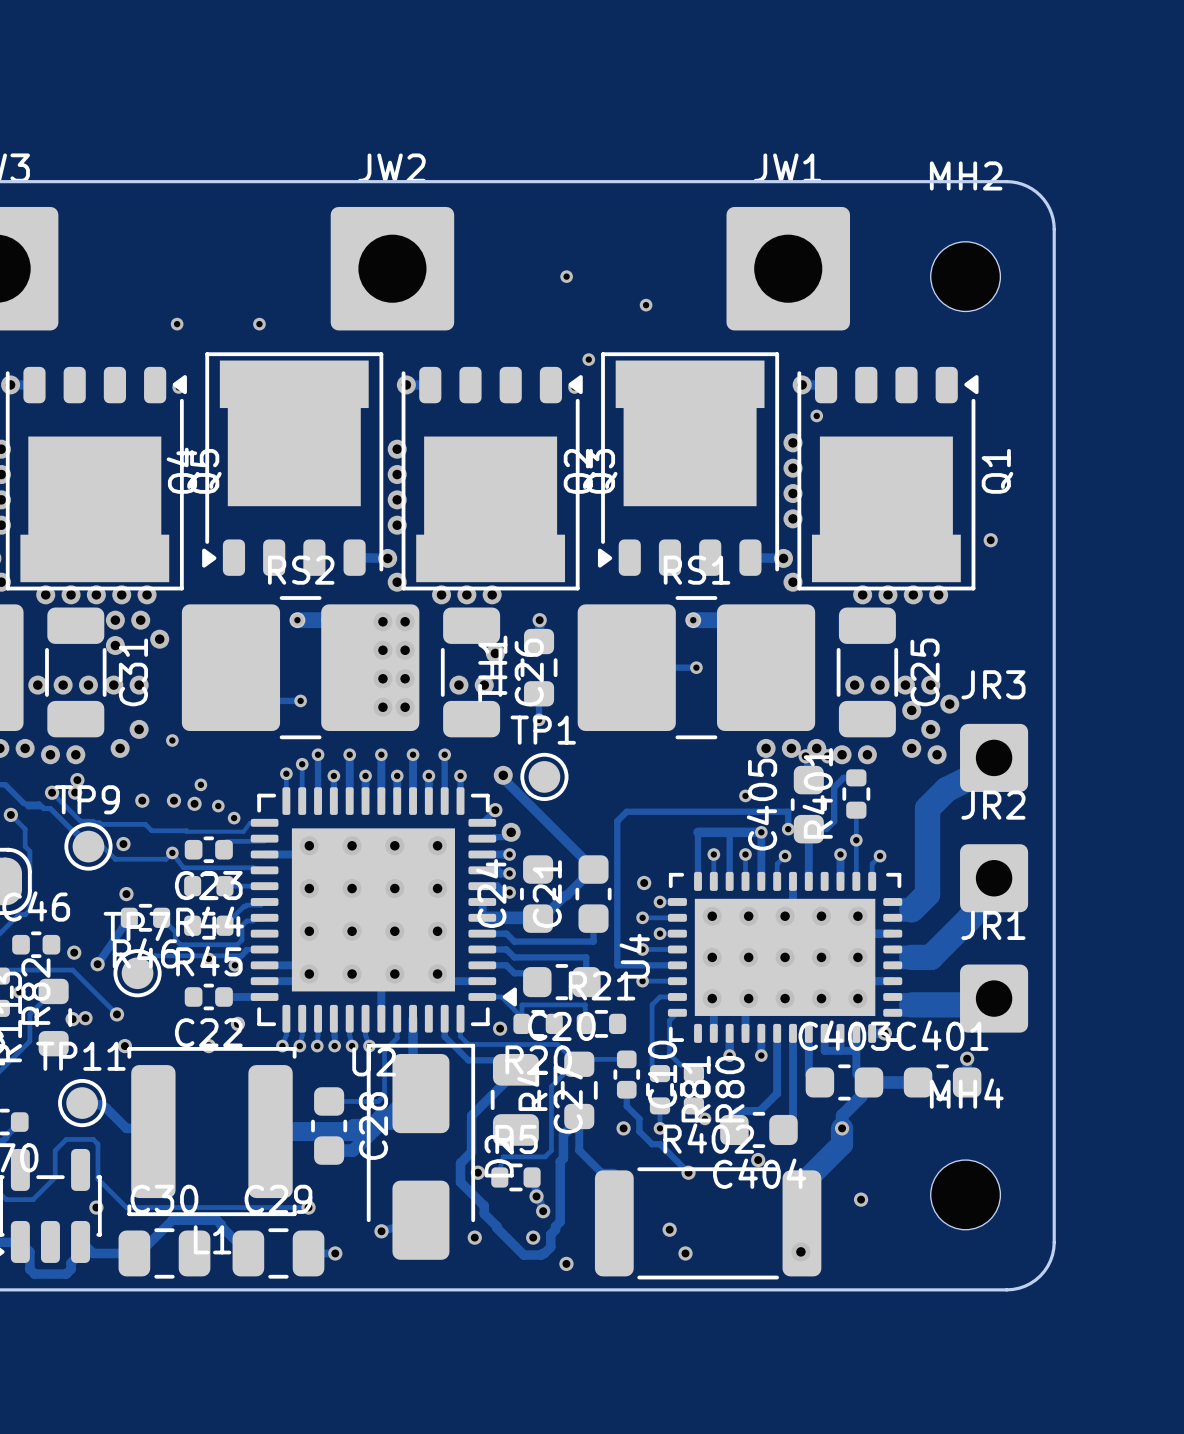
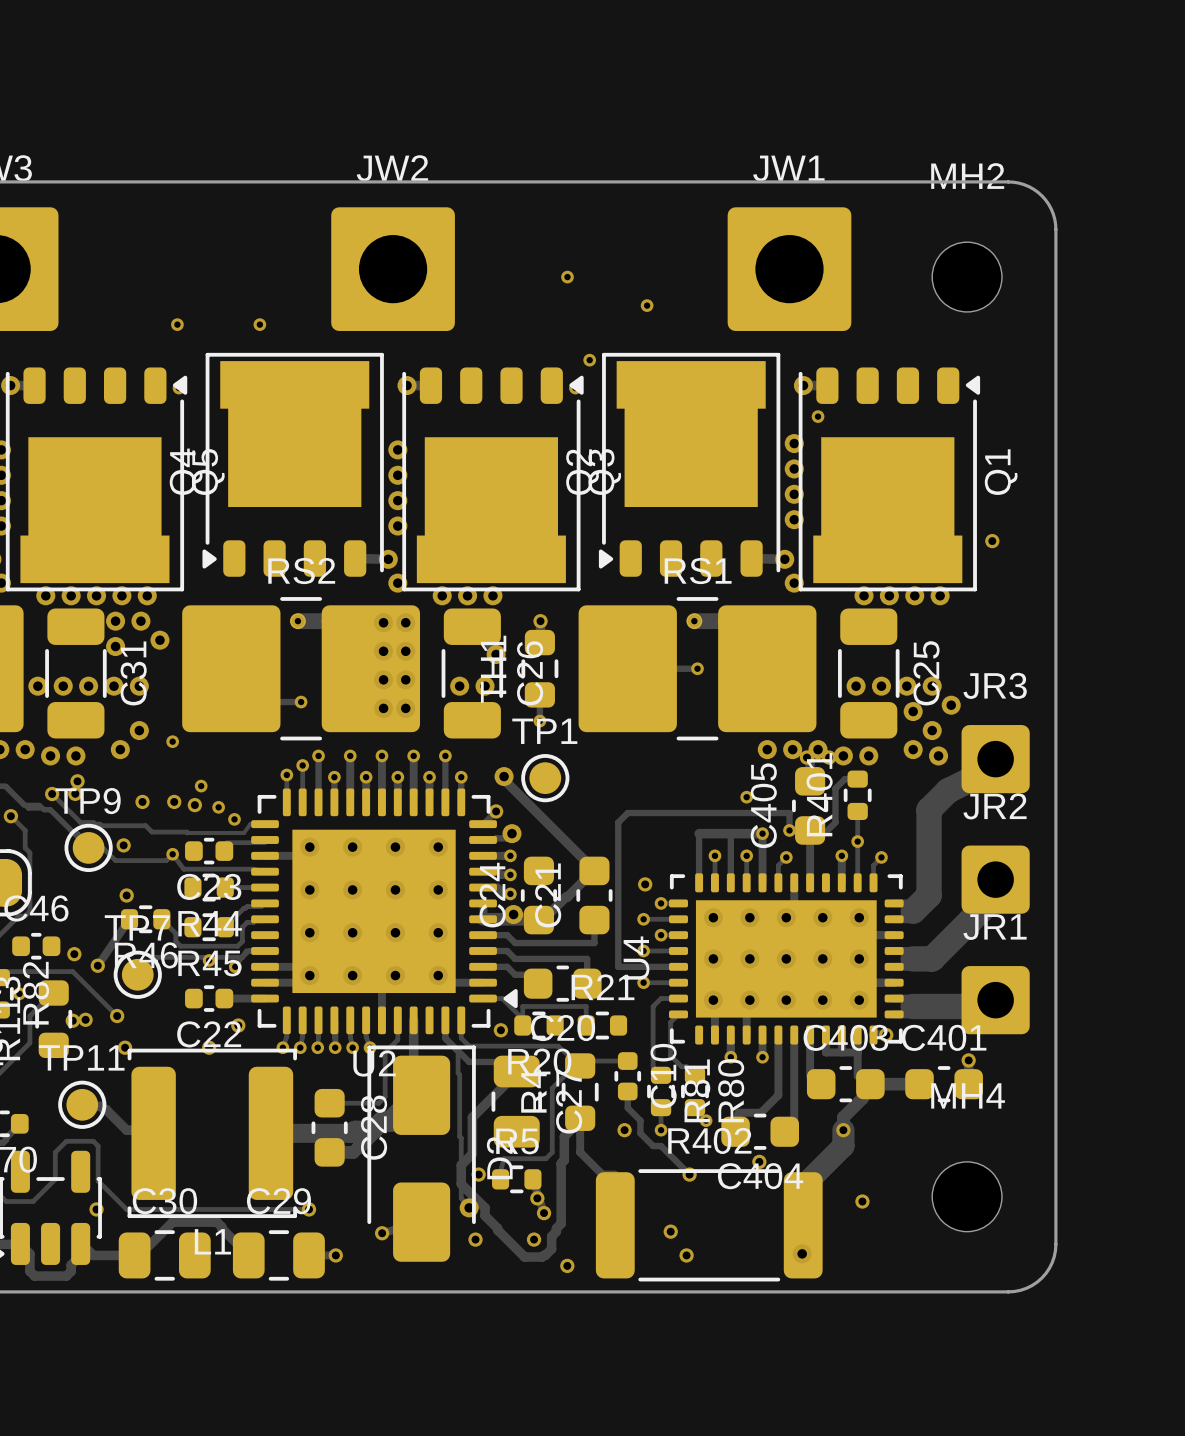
via: none -> (513, 914)
track: none -> (445, 1020) (445, 1039) (458, 1050) (461, 1198) (469, 1207)
via: none -> (469, 1207)

